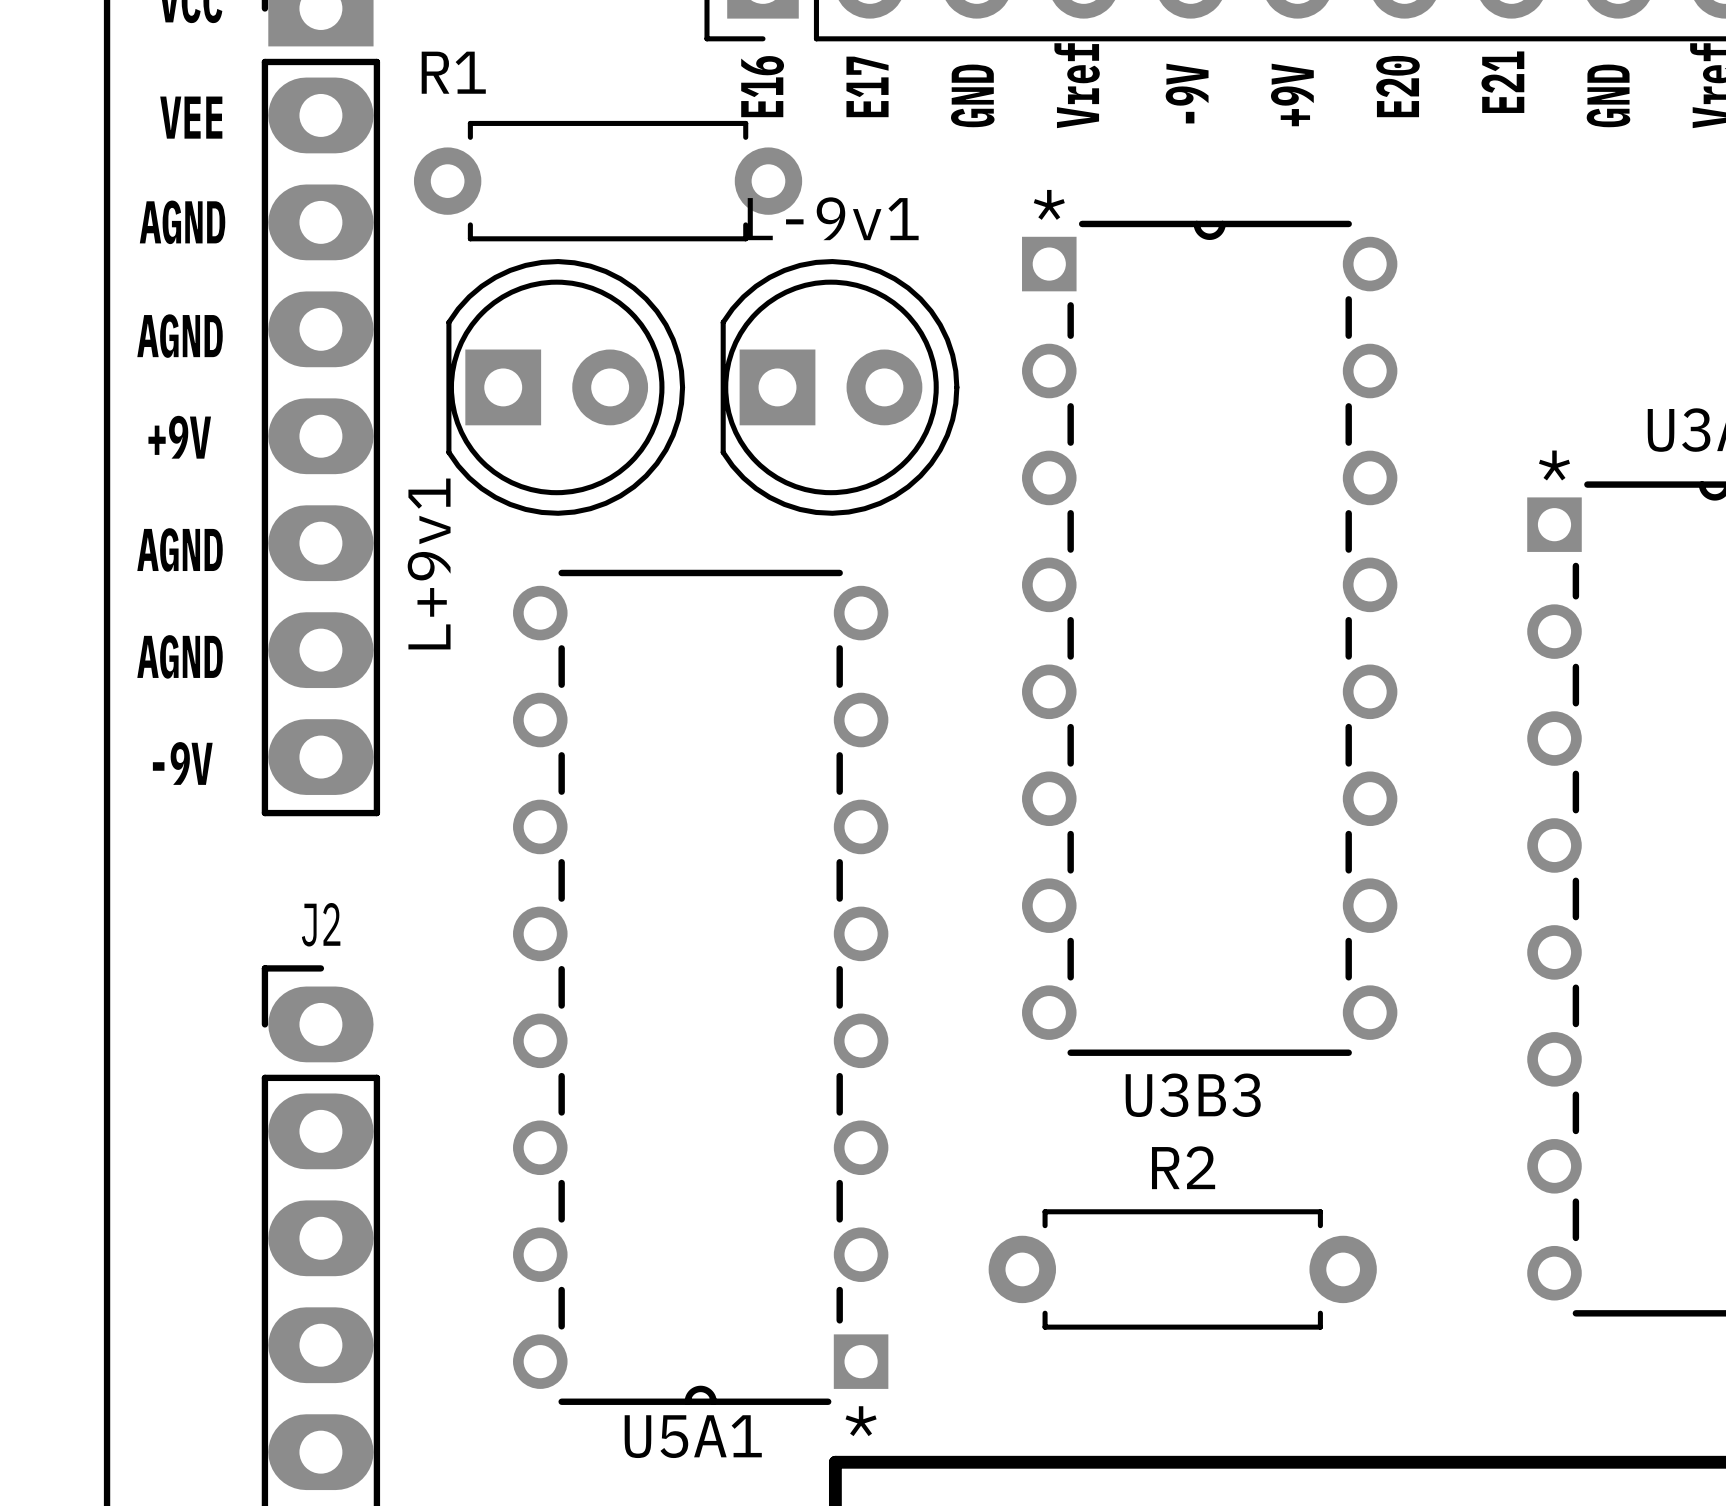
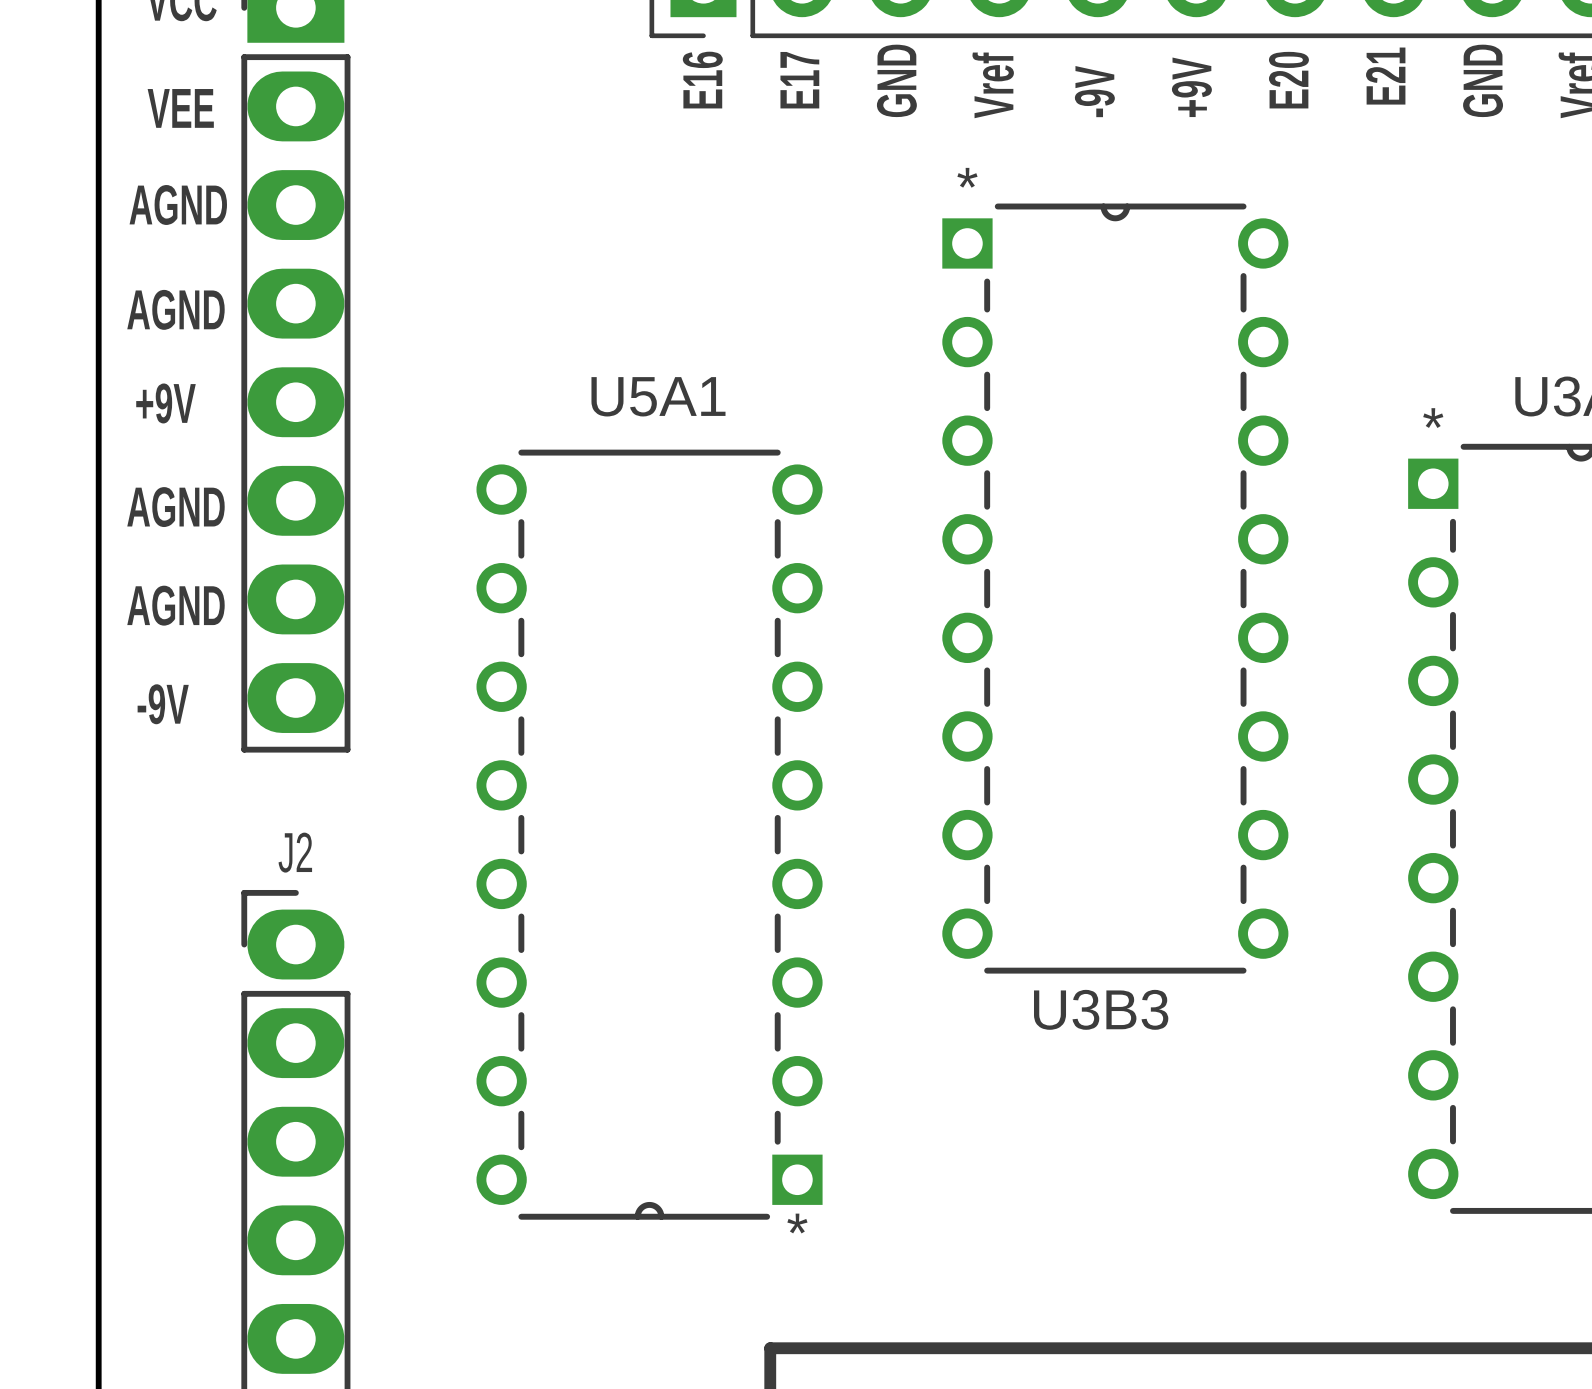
R1: (608, 181) -> none
L+9v1: (565, 387) -> none
L-9v1: (840, 387) -> none
U5A1 position: (700, 987) -> (649, 834)
R2: (1182, 1269) -> none
U5A1 name position: U5A1 (693, 1436) -> U5A1 (658, 396)

